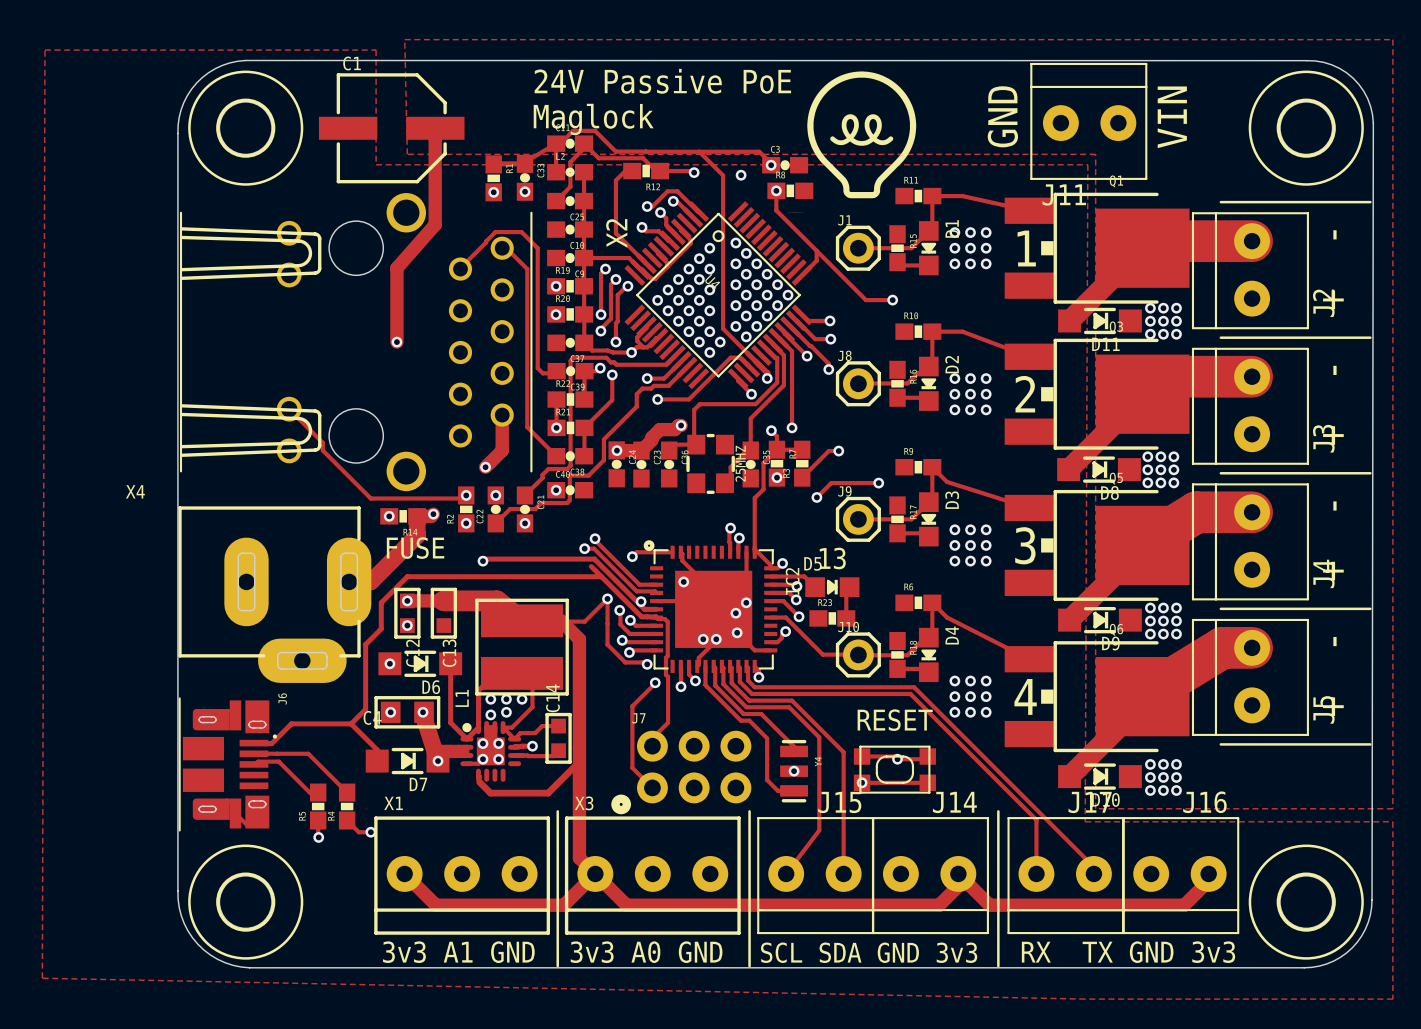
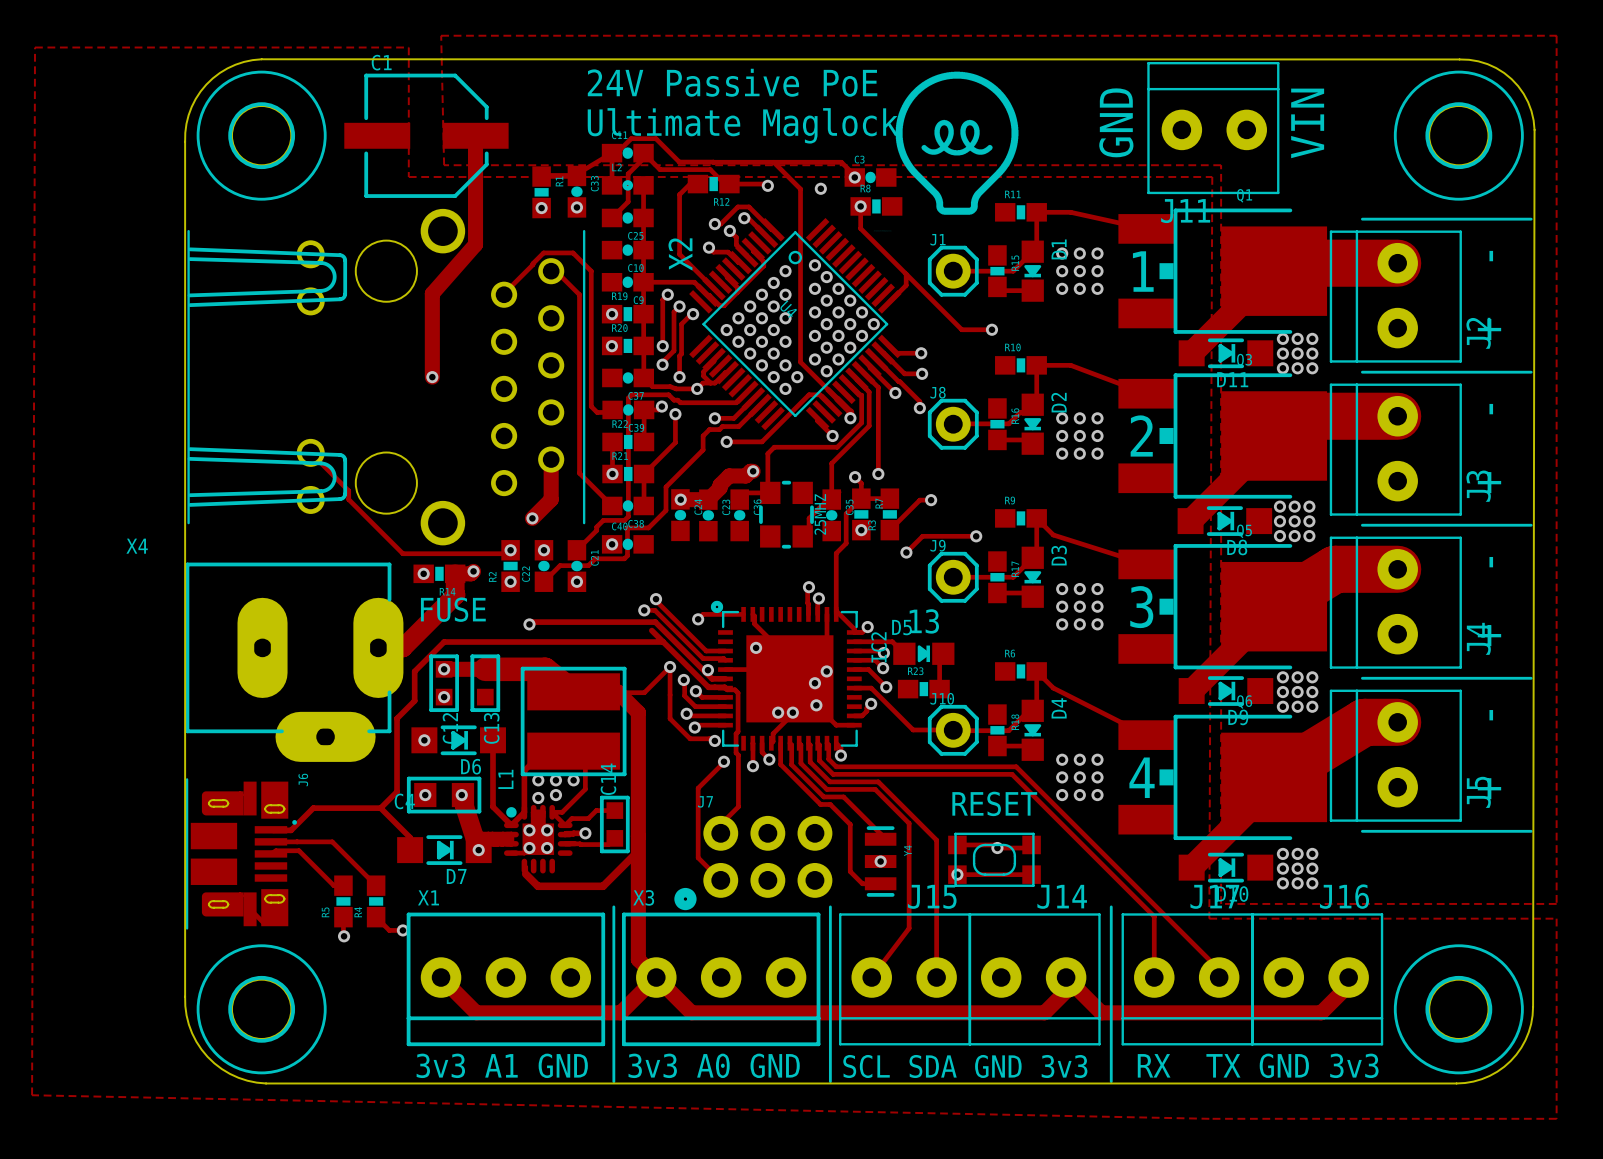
text: Maglock (593, 119) -> Ultimate Maglock (743, 125)

